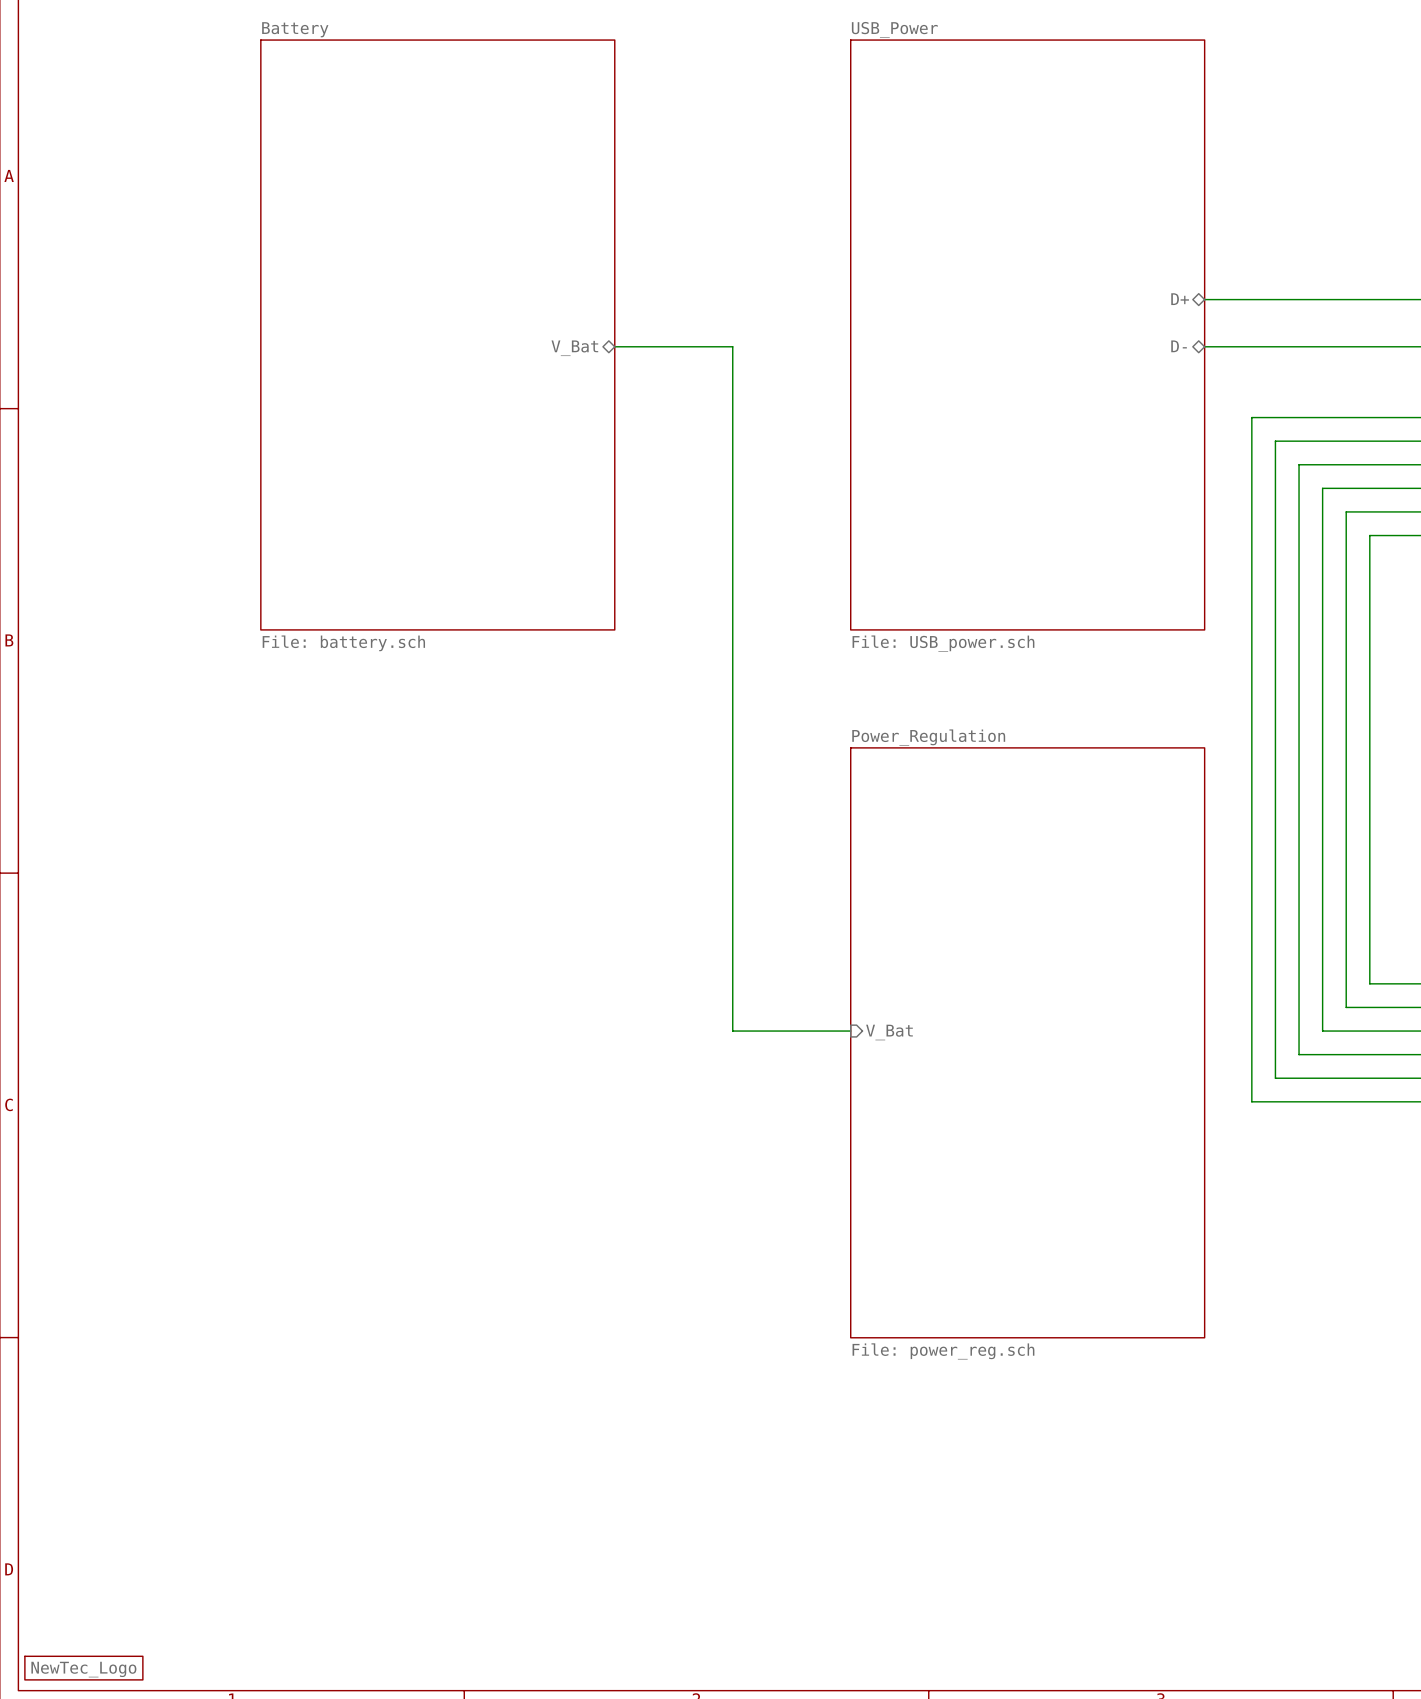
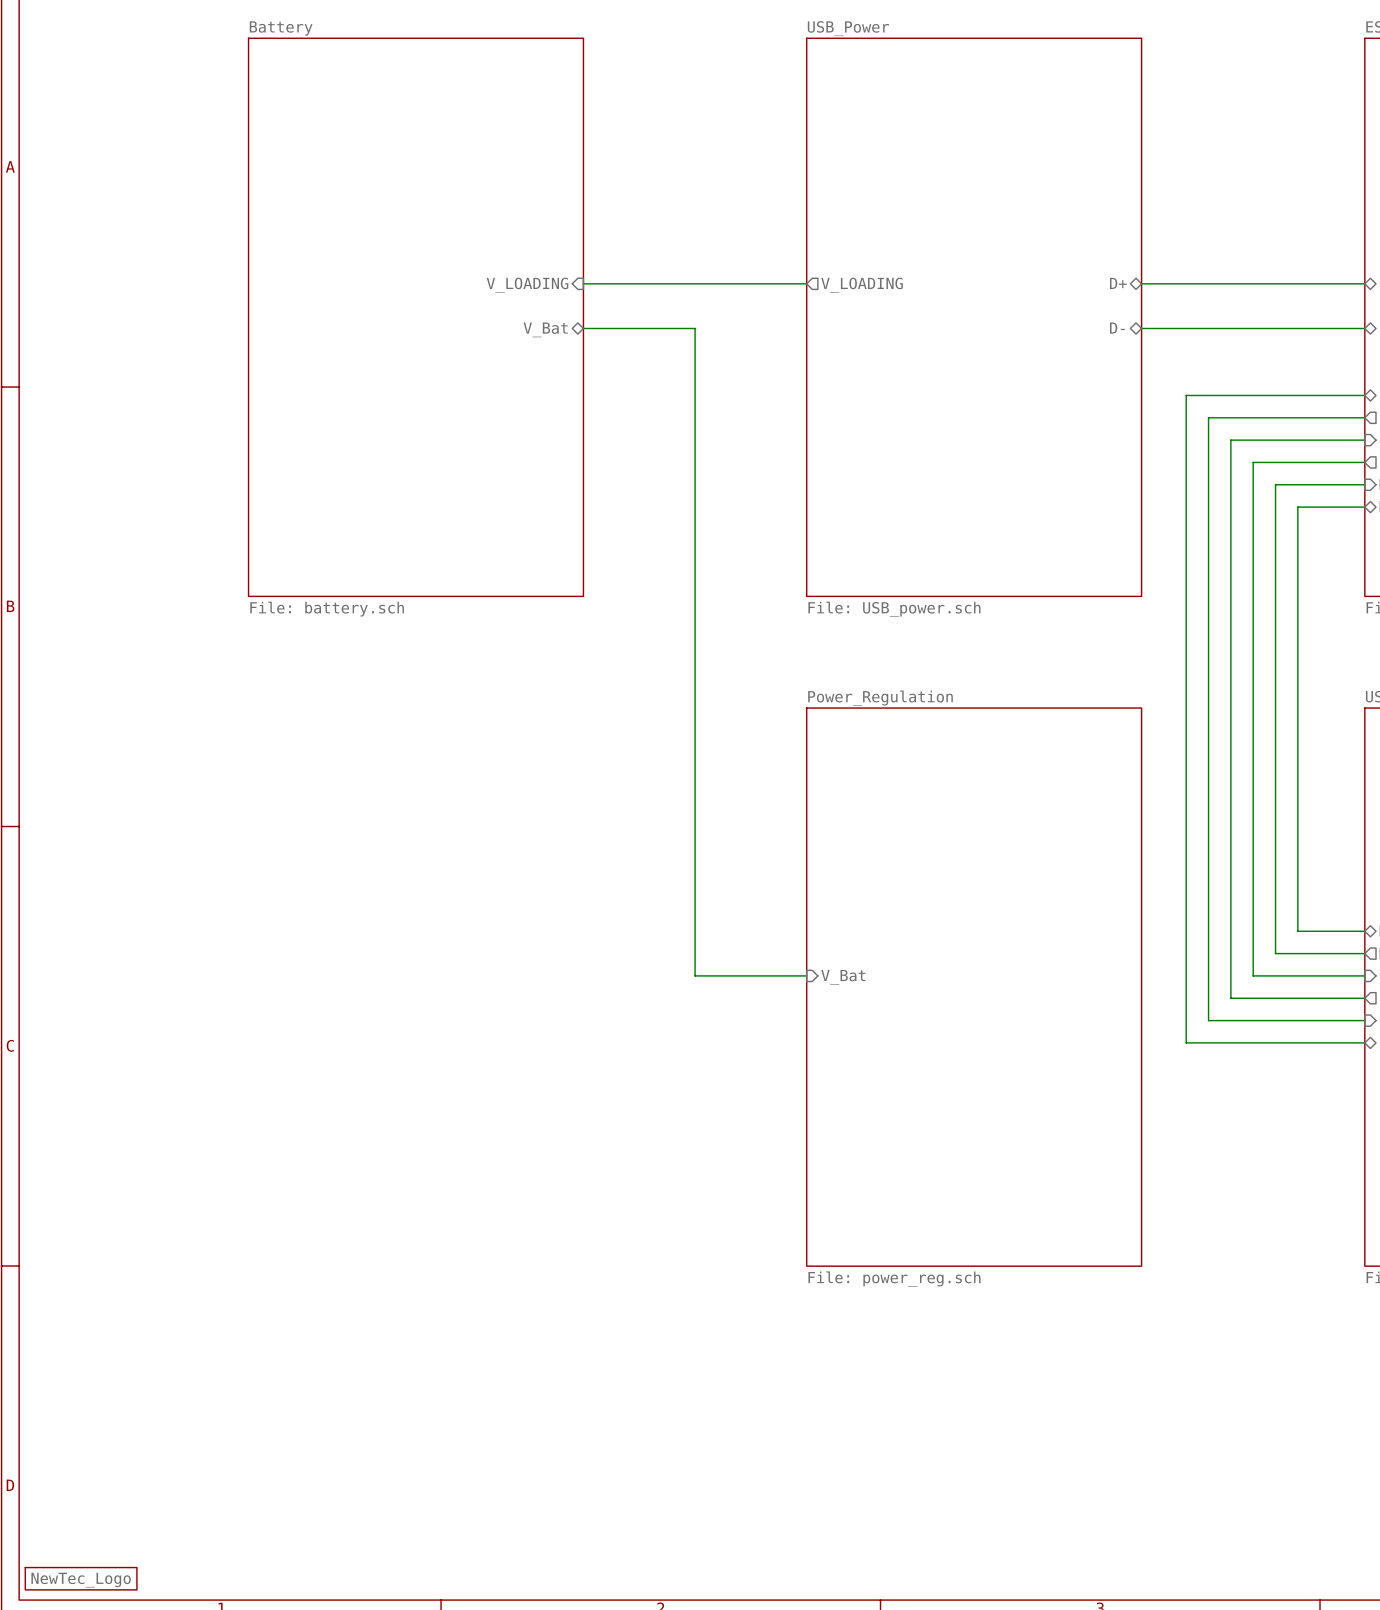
wire: none -> (583, 283) (806, 283)
sheet pin: none -> V_LOADING (527, 285)
sheet pin: none -> V_LOADING (862, 285)

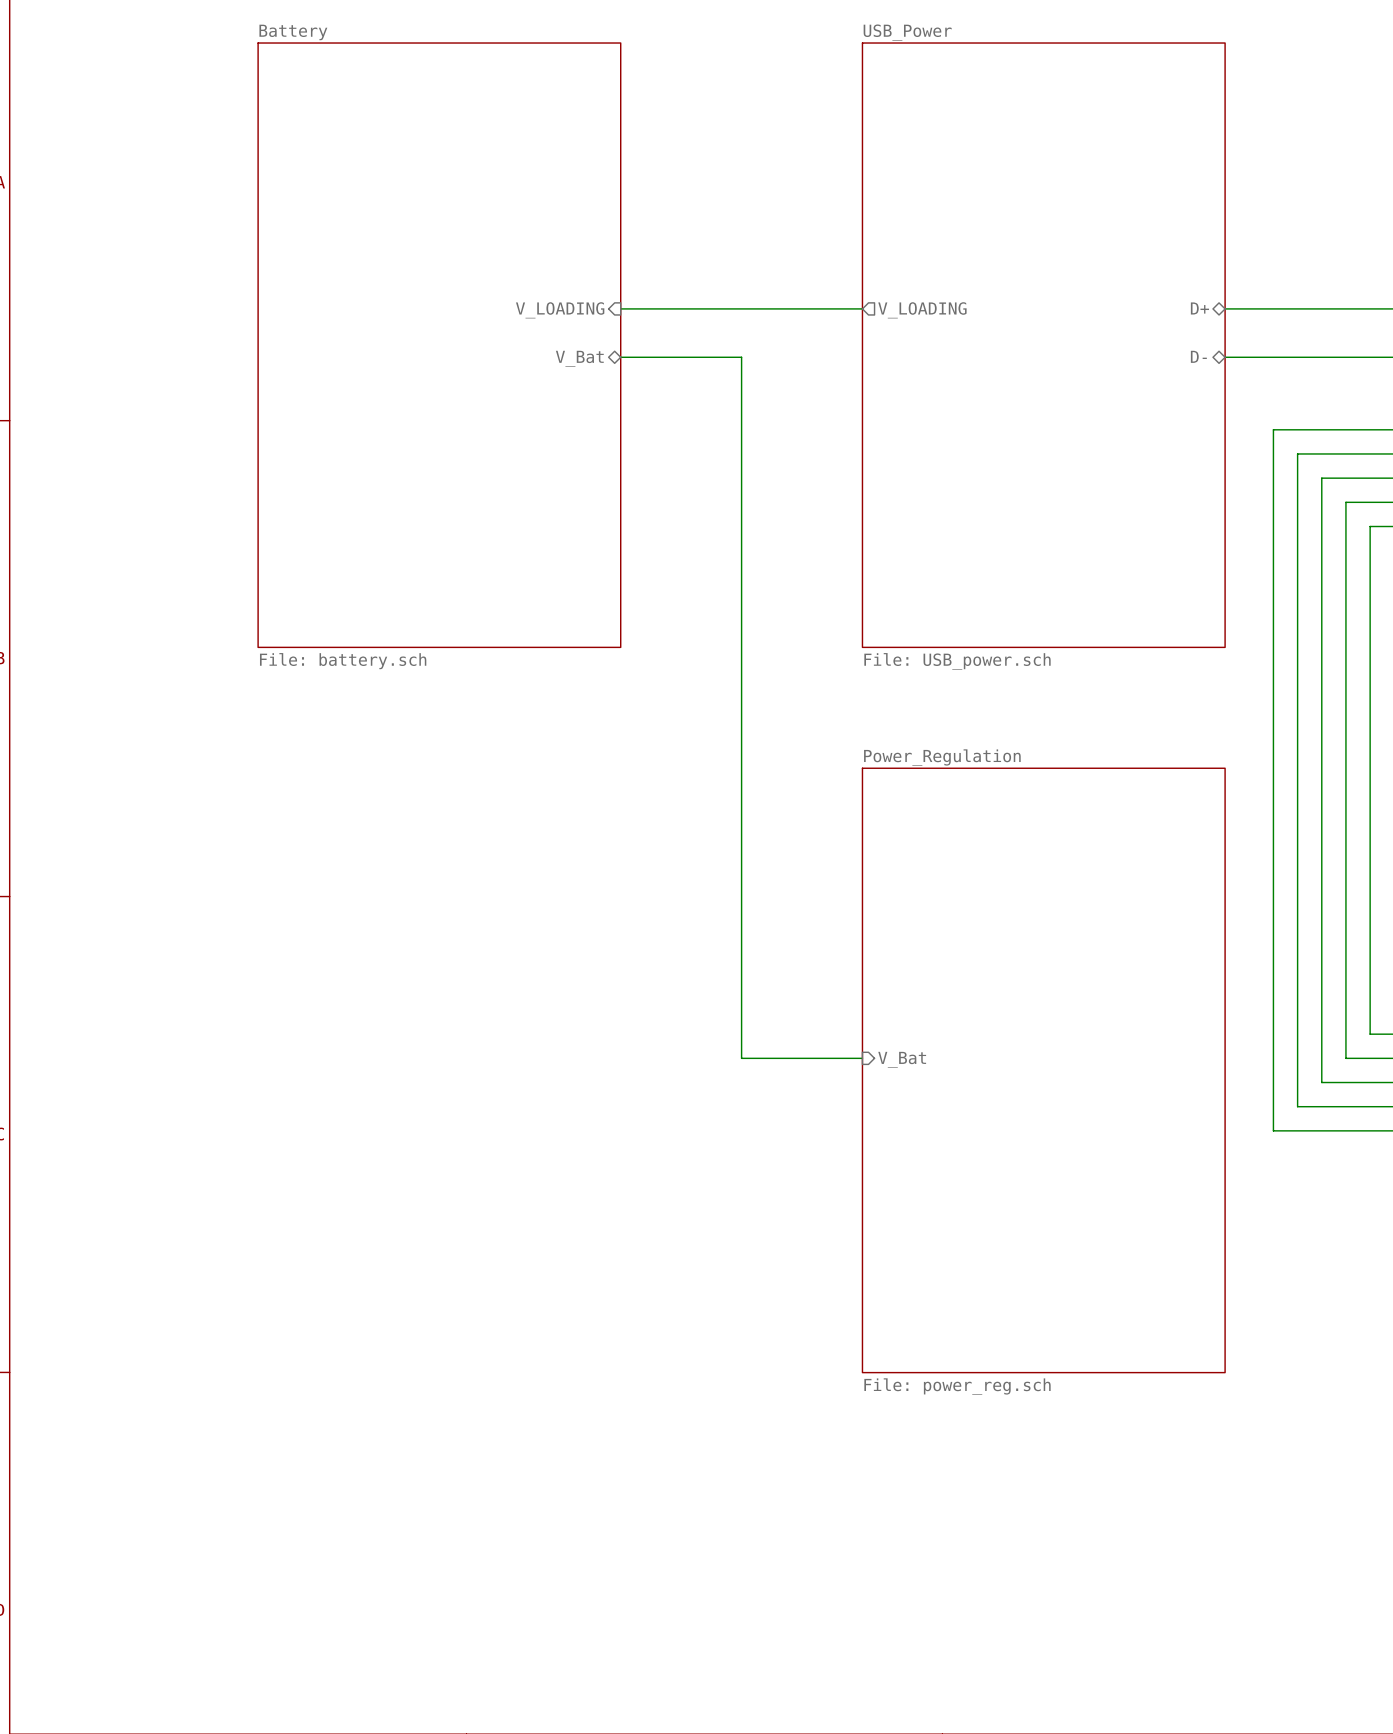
part: NewTec_Logo (81, 1578) -> none

